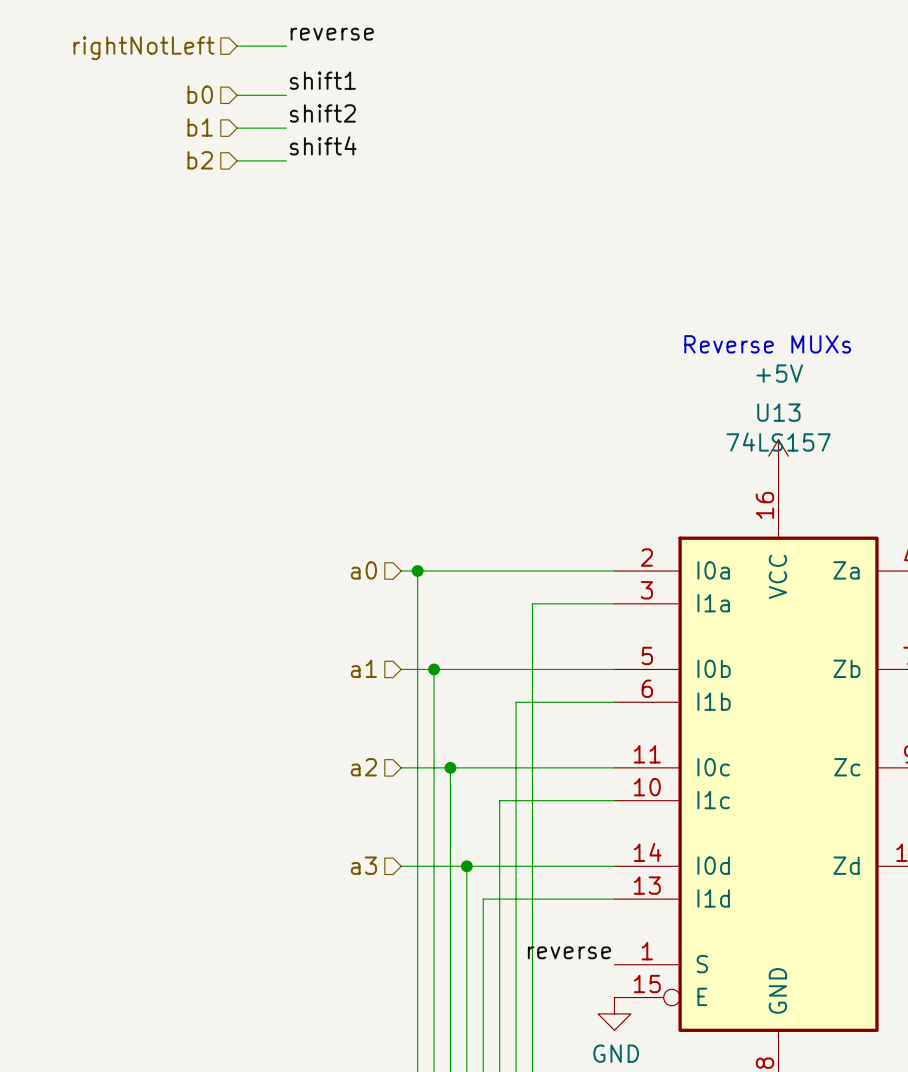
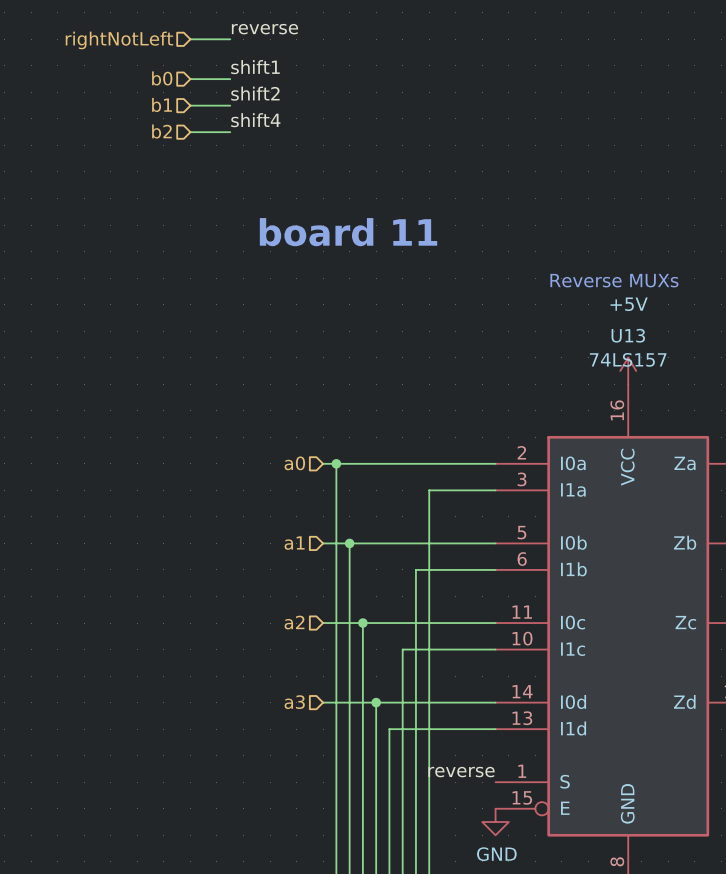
text: none -> board 11 (348, 232)

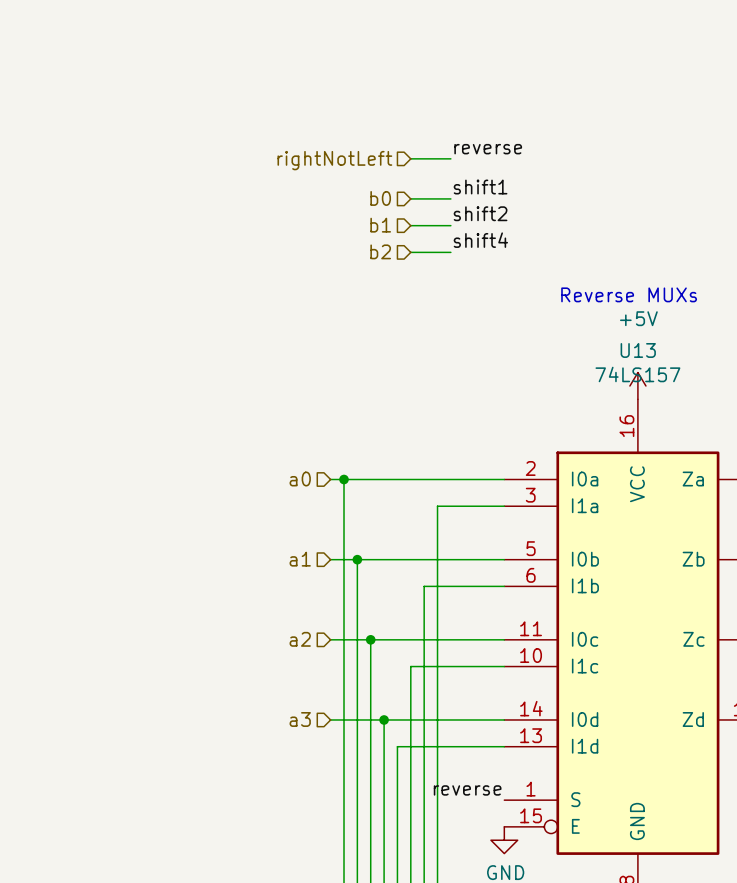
label position: reverse (264, 29) -> reverse (488, 149)
wire: (190, 39) (230, 39) -> (410, 158) (450, 158)
hierarchical label position: rightNotLeft (119, 40) -> rightNotLeft (334, 160)
label position: shift1 (255, 67) -> shift1 (480, 187)
hierarchical label position: b0 (162, 78) -> b0 (380, 198)
wire: (190, 79) (230, 79) -> (410, 198) (450, 198)
label position: shift2 (255, 93) -> shift2 (480, 213)
hierarchical label position: b1 (162, 104) -> b1 (380, 225)
wire: (190, 105) (230, 105) -> (410, 225) (450, 225)
label position: shift4 (255, 120) -> shift4 (480, 240)
hierarchical label position: b2 (161, 131) -> b2 (380, 251)
wire: (190, 132) (230, 132) -> (410, 252) (450, 252)
text: board 11 (348, 232) -> none

